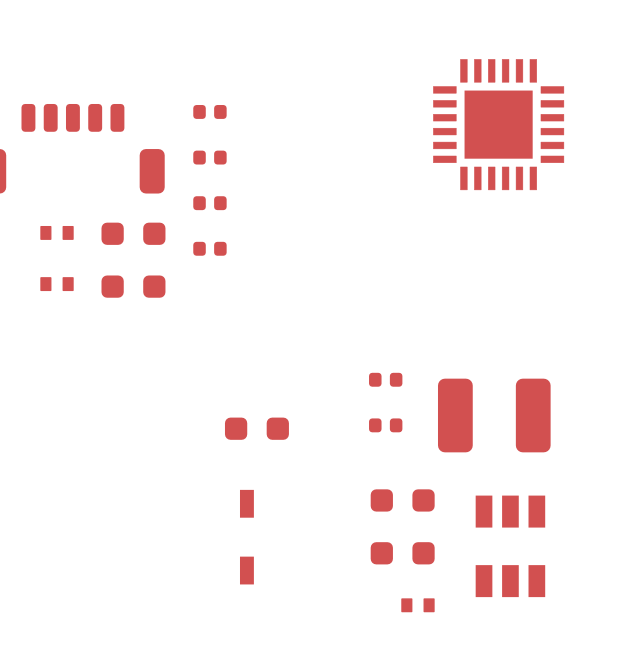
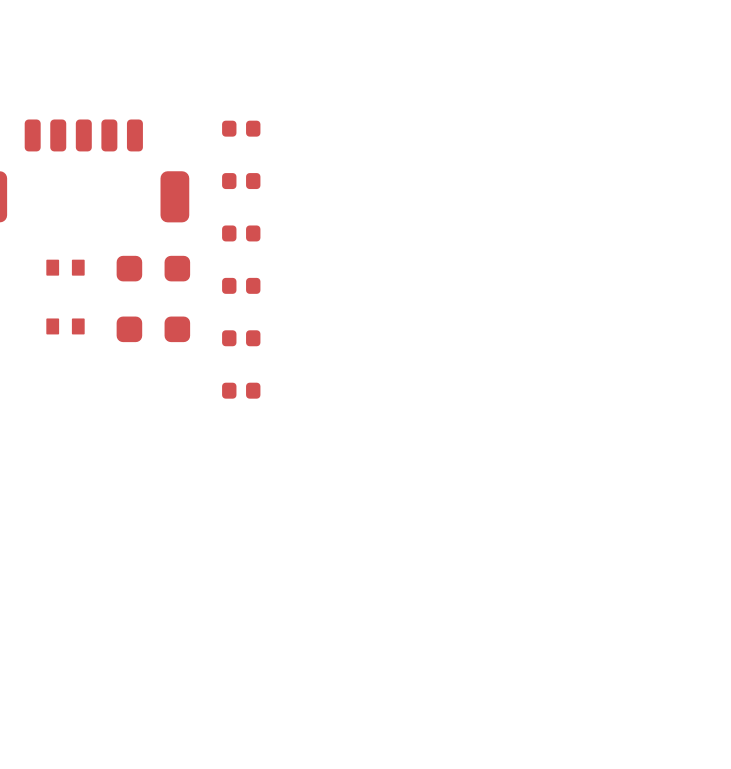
part: (498, 124) -> none
part: none -> (241, 338)
part: none -> (241, 390)
part: (385, 379) -> none
part: (494, 415) -> none
part: (385, 425) -> none
part: (256, 428) -> none
part: (402, 500) -> none
part: (246, 537) -> none
part: (510, 546) -> none
part: (402, 553) -> none
part: (417, 605) -> none

